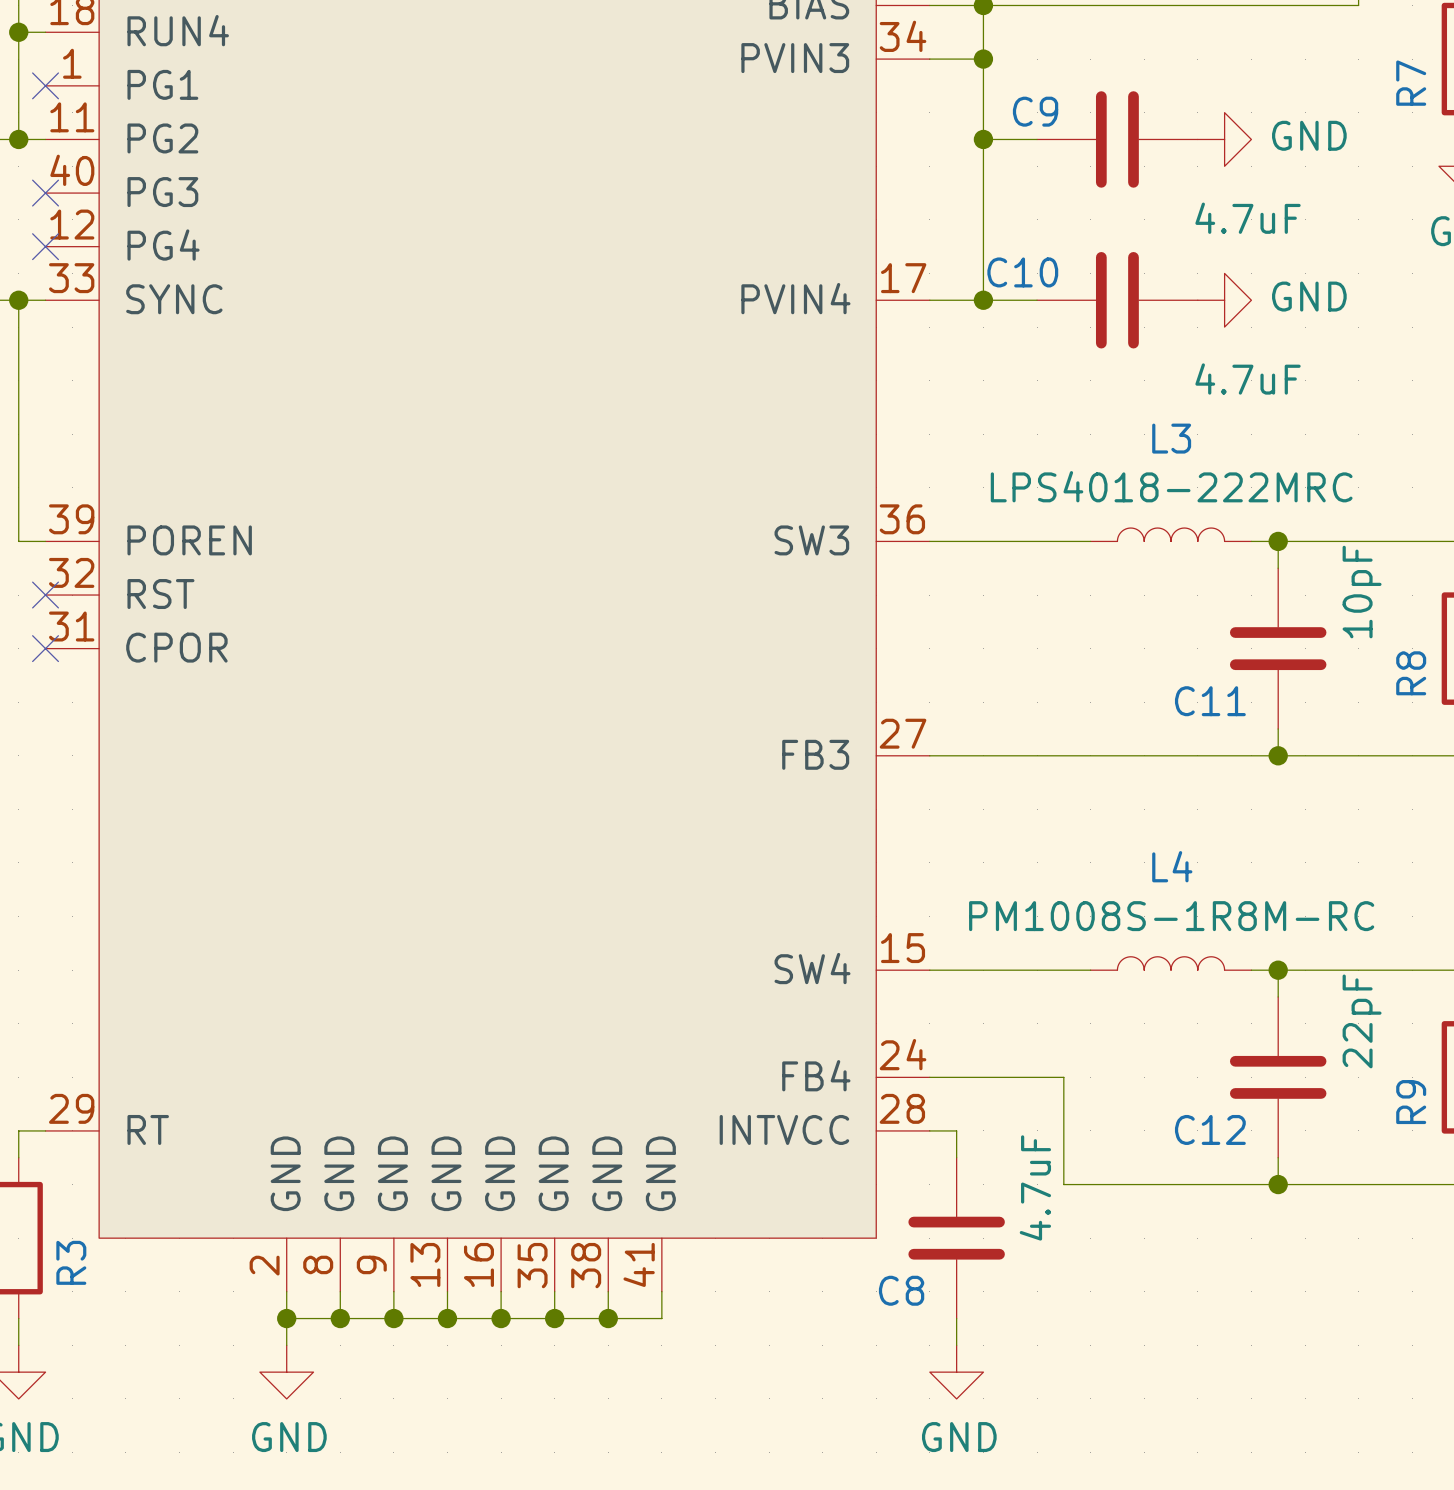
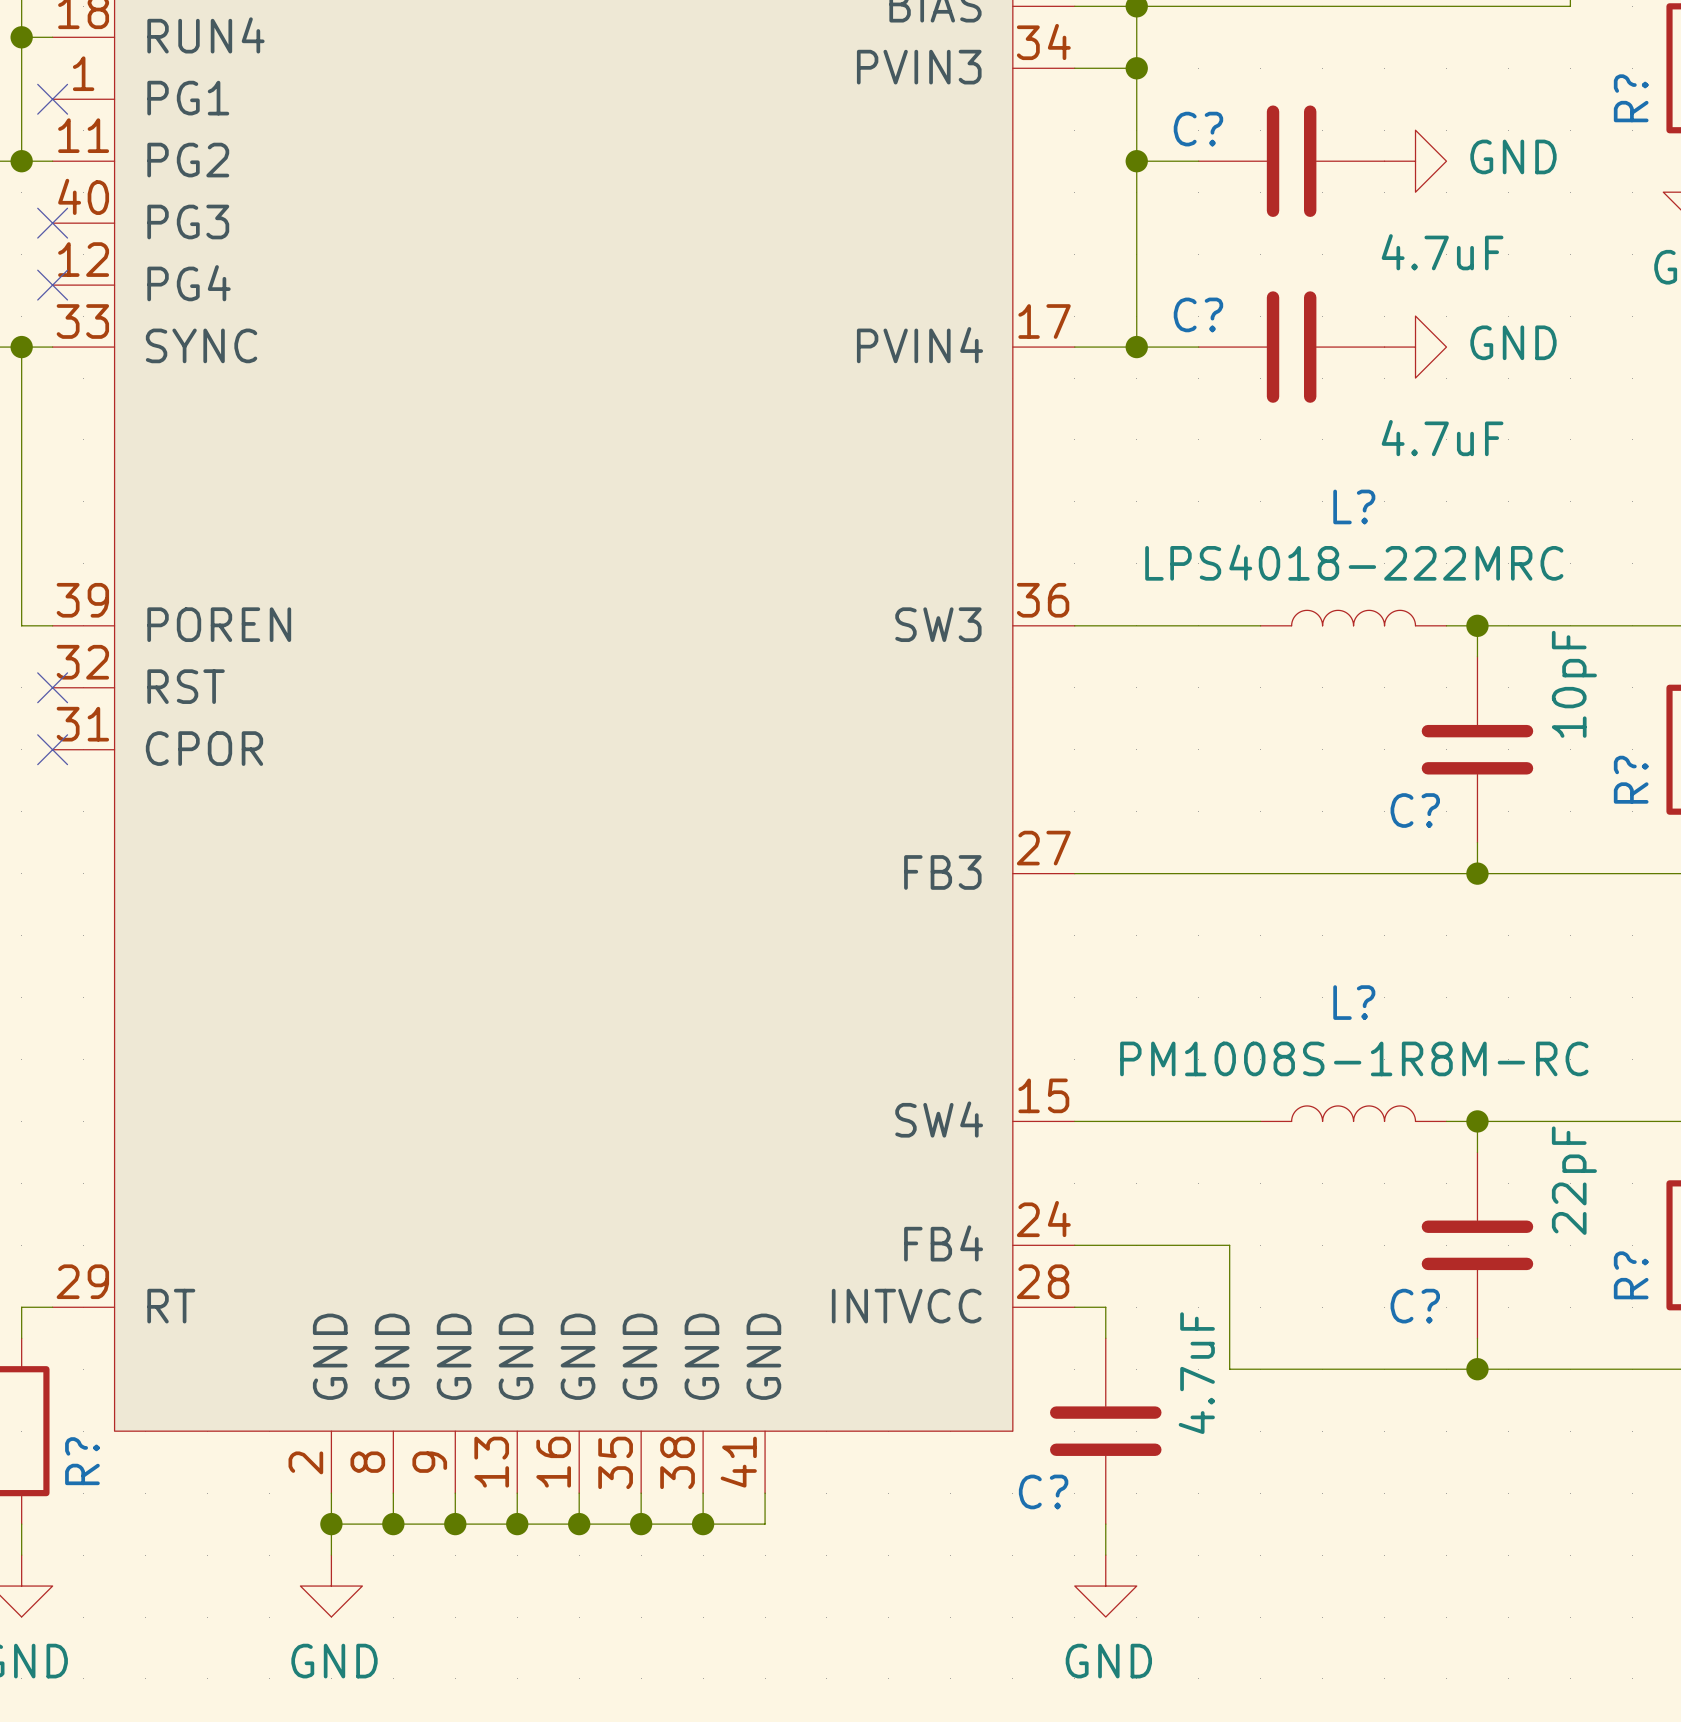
R7 name: R7 (1411, 83) -> R? (1631, 98)
C9 name: C9 (1035, 111) -> C? (1198, 129)
C10 name: C10 (1022, 272) -> C? (1198, 314)
L3 name: L3 (1171, 438) -> L? (1354, 506)
R8 name: R8 (1411, 673) -> R? (1631, 779)
C11 name: C11 (1210, 701) -> C? (1415, 810)
L4 name: L4 (1172, 866) -> L? (1354, 1002)
R9 name: R9 (1411, 1102) -> R? (1631, 1275)
C12 name: C12 (1210, 1129) -> C? (1415, 1306)
R3 name: R3 (71, 1262) -> R? (82, 1461)
C8 name: C8 (901, 1290) -> C? (1043, 1491)

